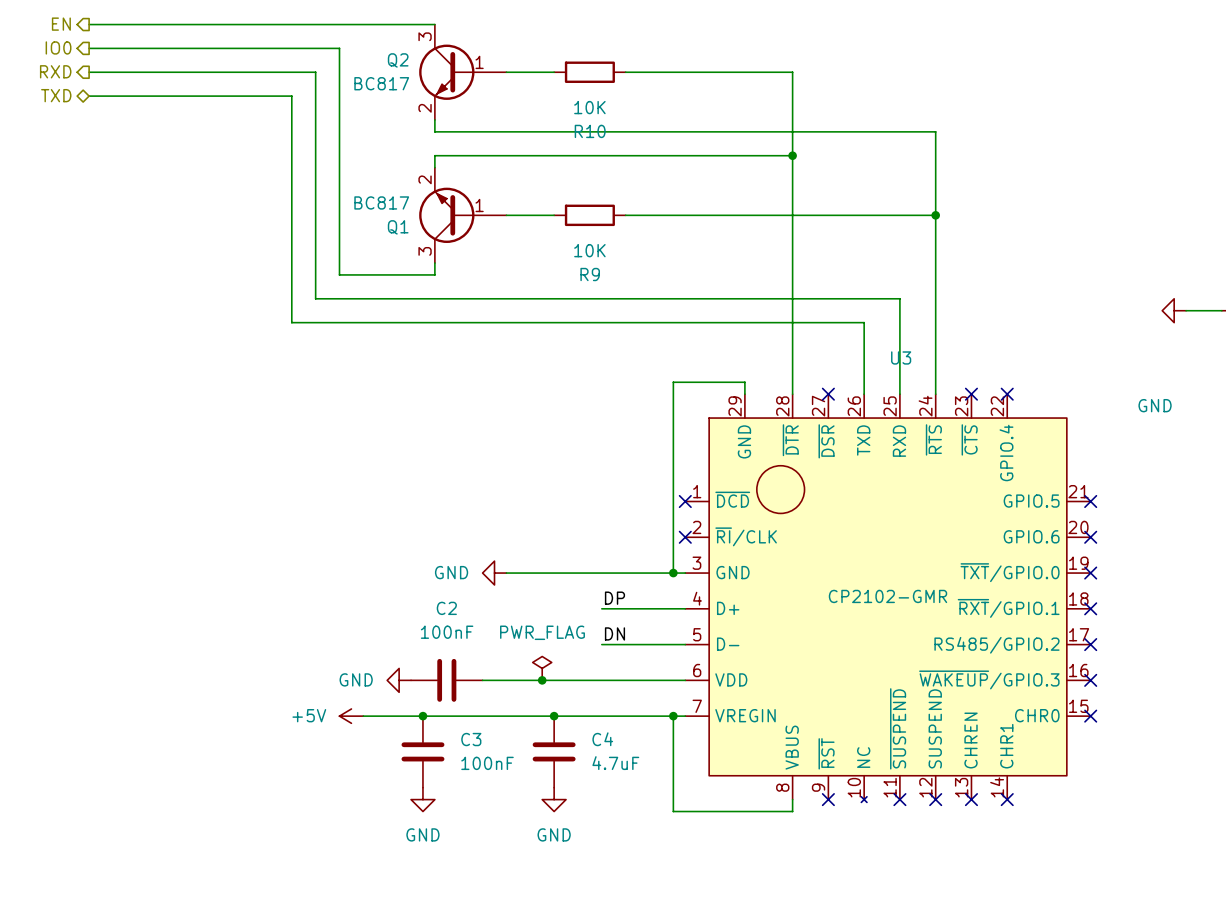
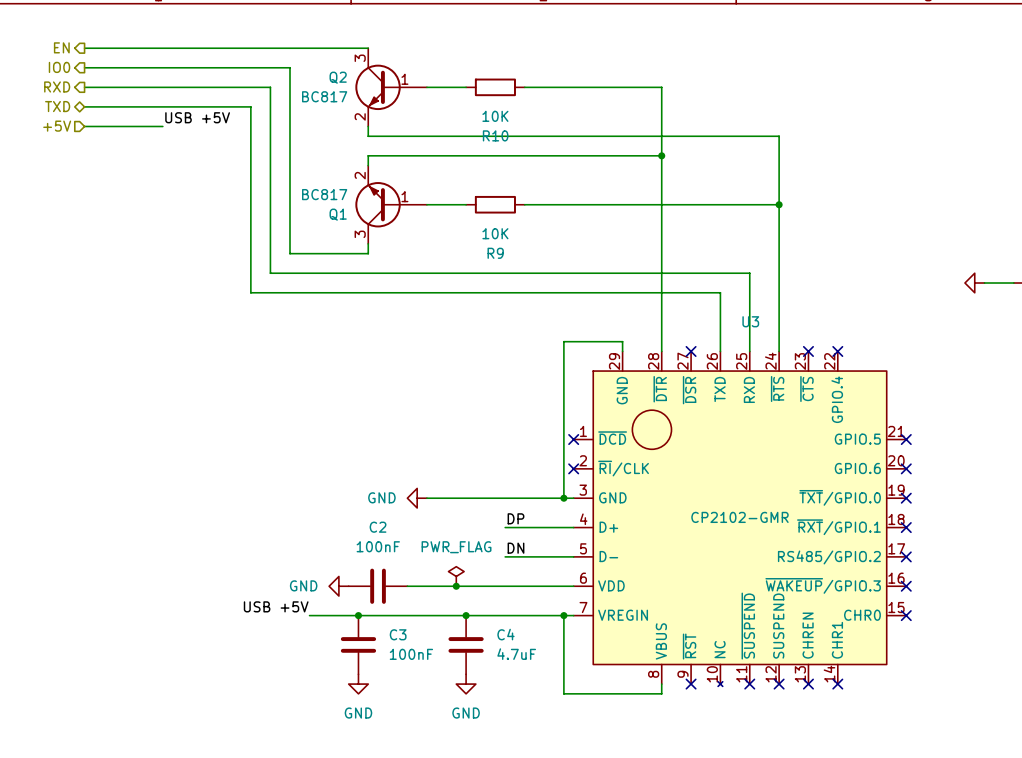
label: none -> USB +5V (197, 117)
hierarchical label: none -> +5V (57, 126)
wire: none -> (84, 126) (162, 126)
power symbol text: GND (1155, 405) -> none
label: none -> USB +5V (276, 606)
power symbol: +5V (351, 716) -> none

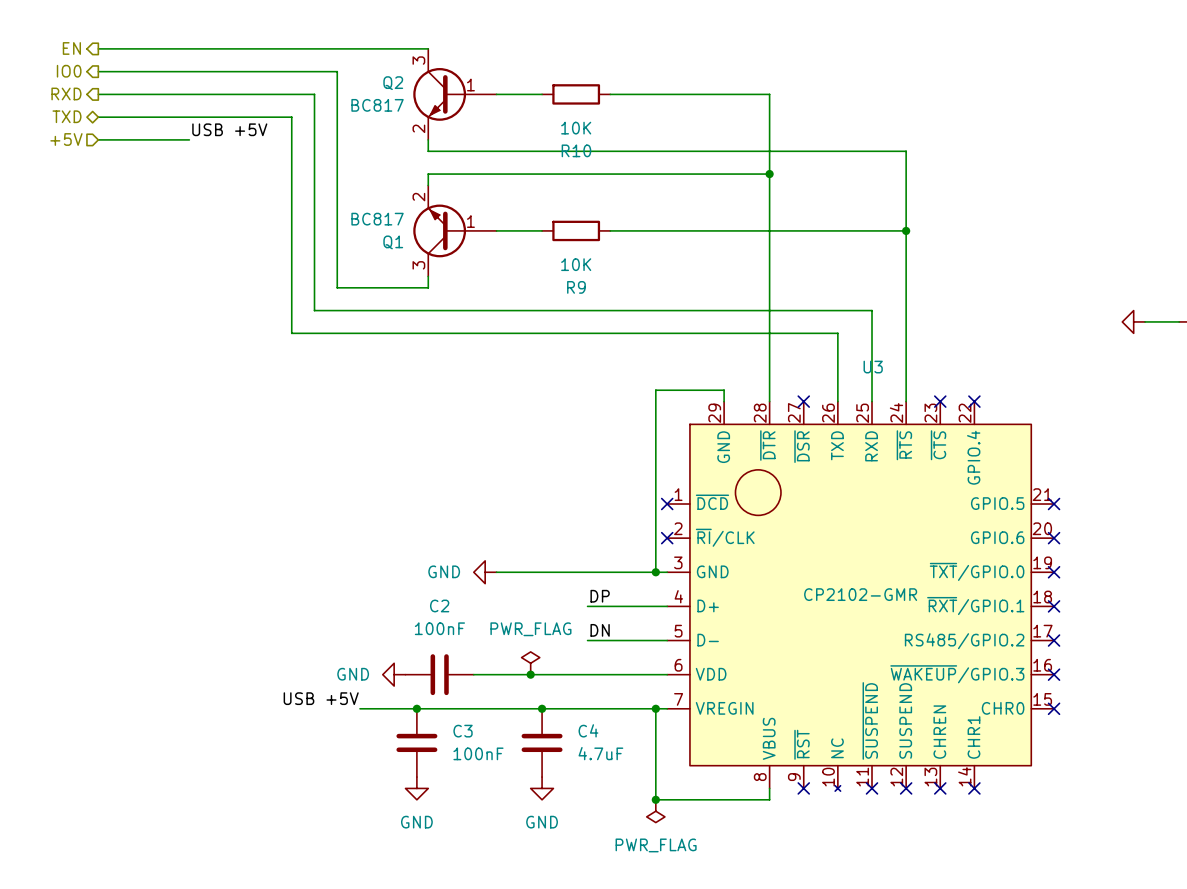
junction: none -> (655, 799)
power symbol: none -> PWR_FLAG (655, 811)

